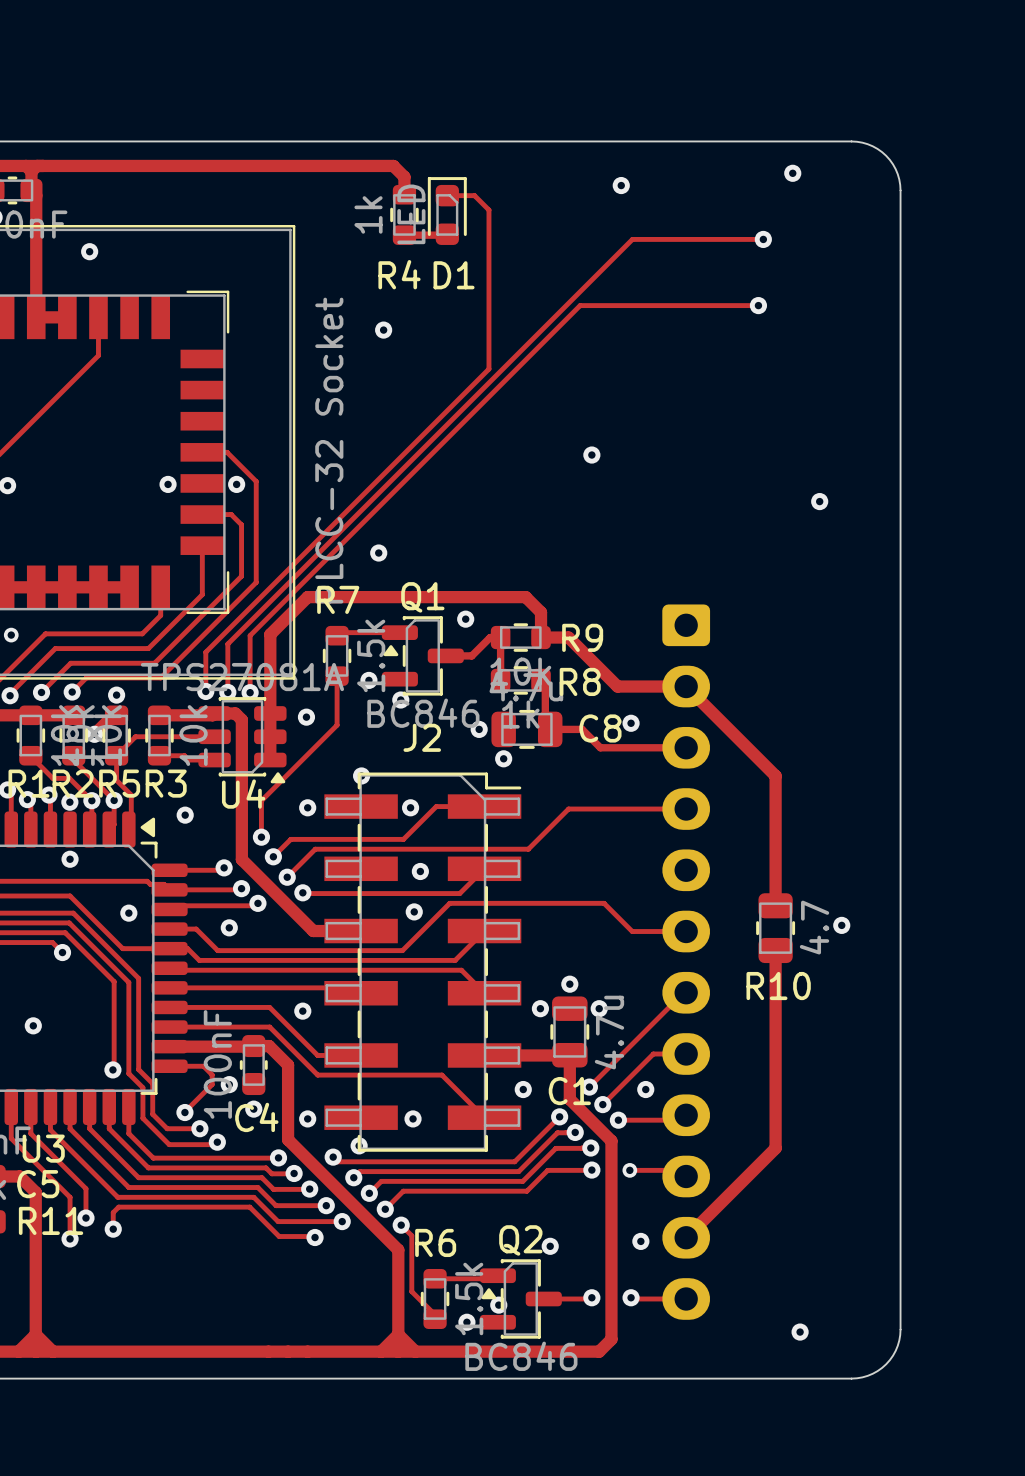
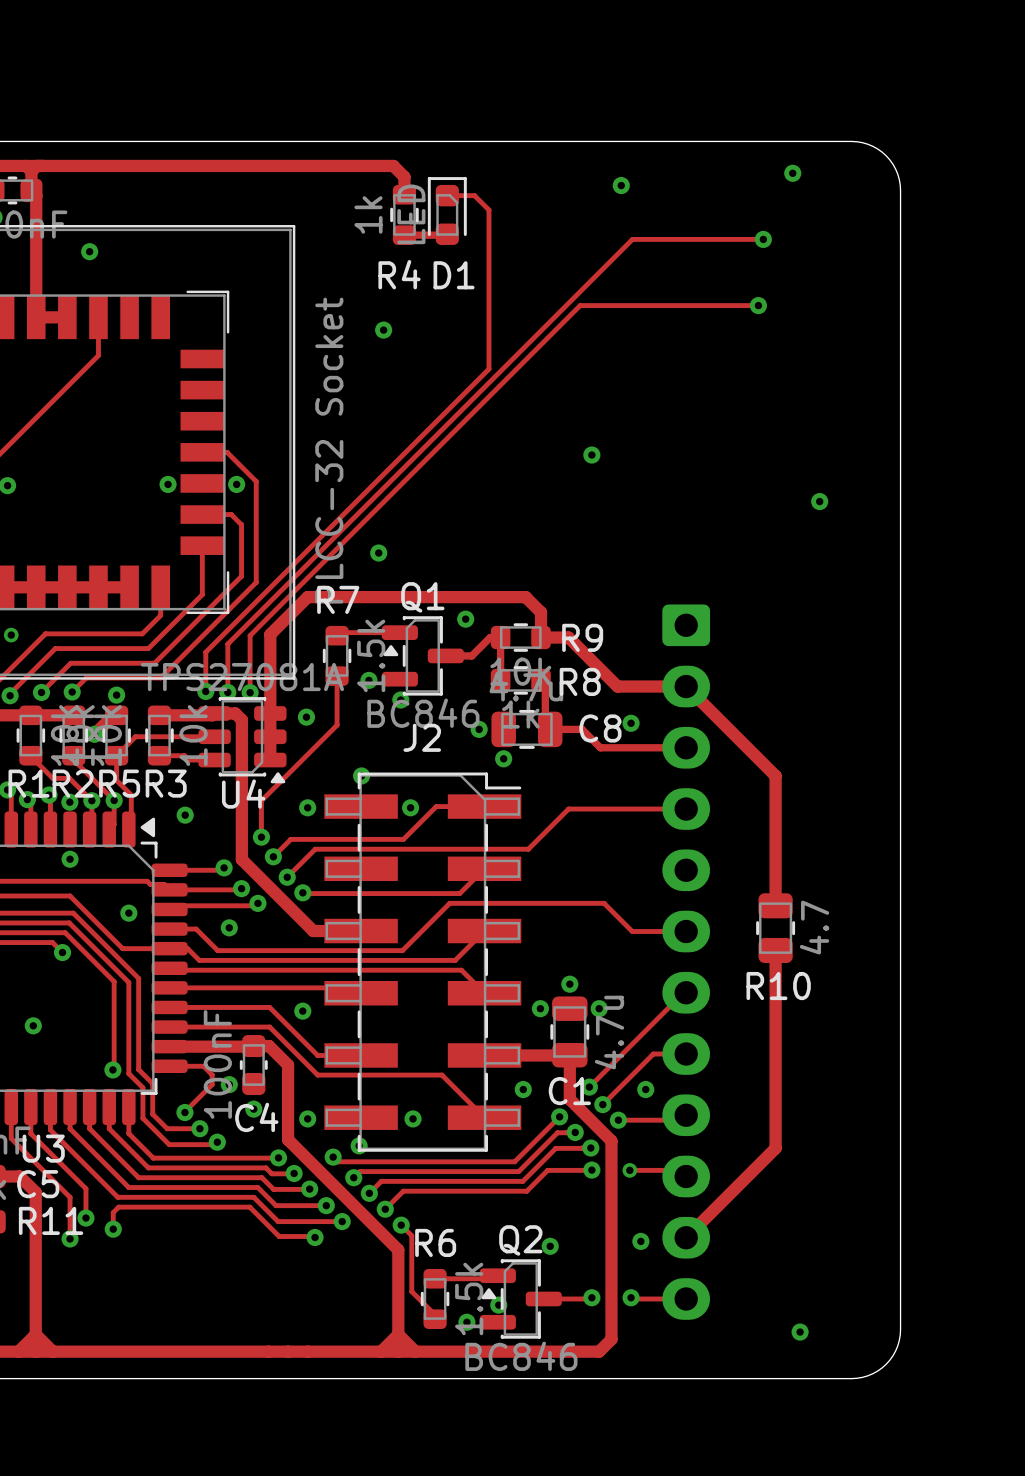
via: (420, 871) -> none
via: (414, 911) -> none
via: (841, 925) -> none

